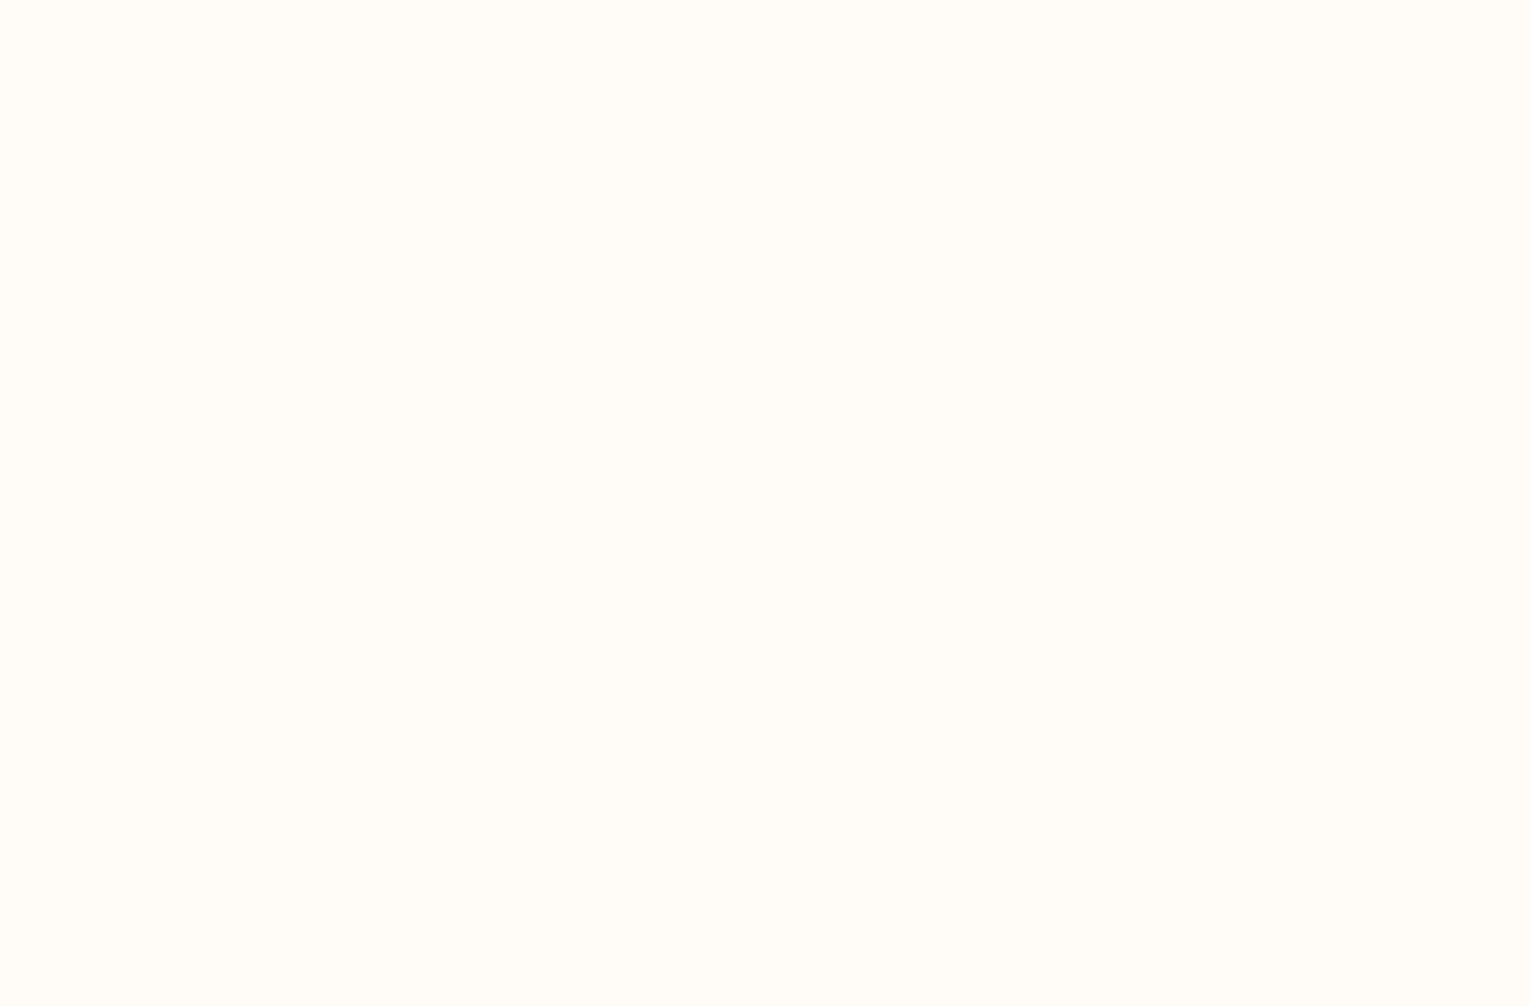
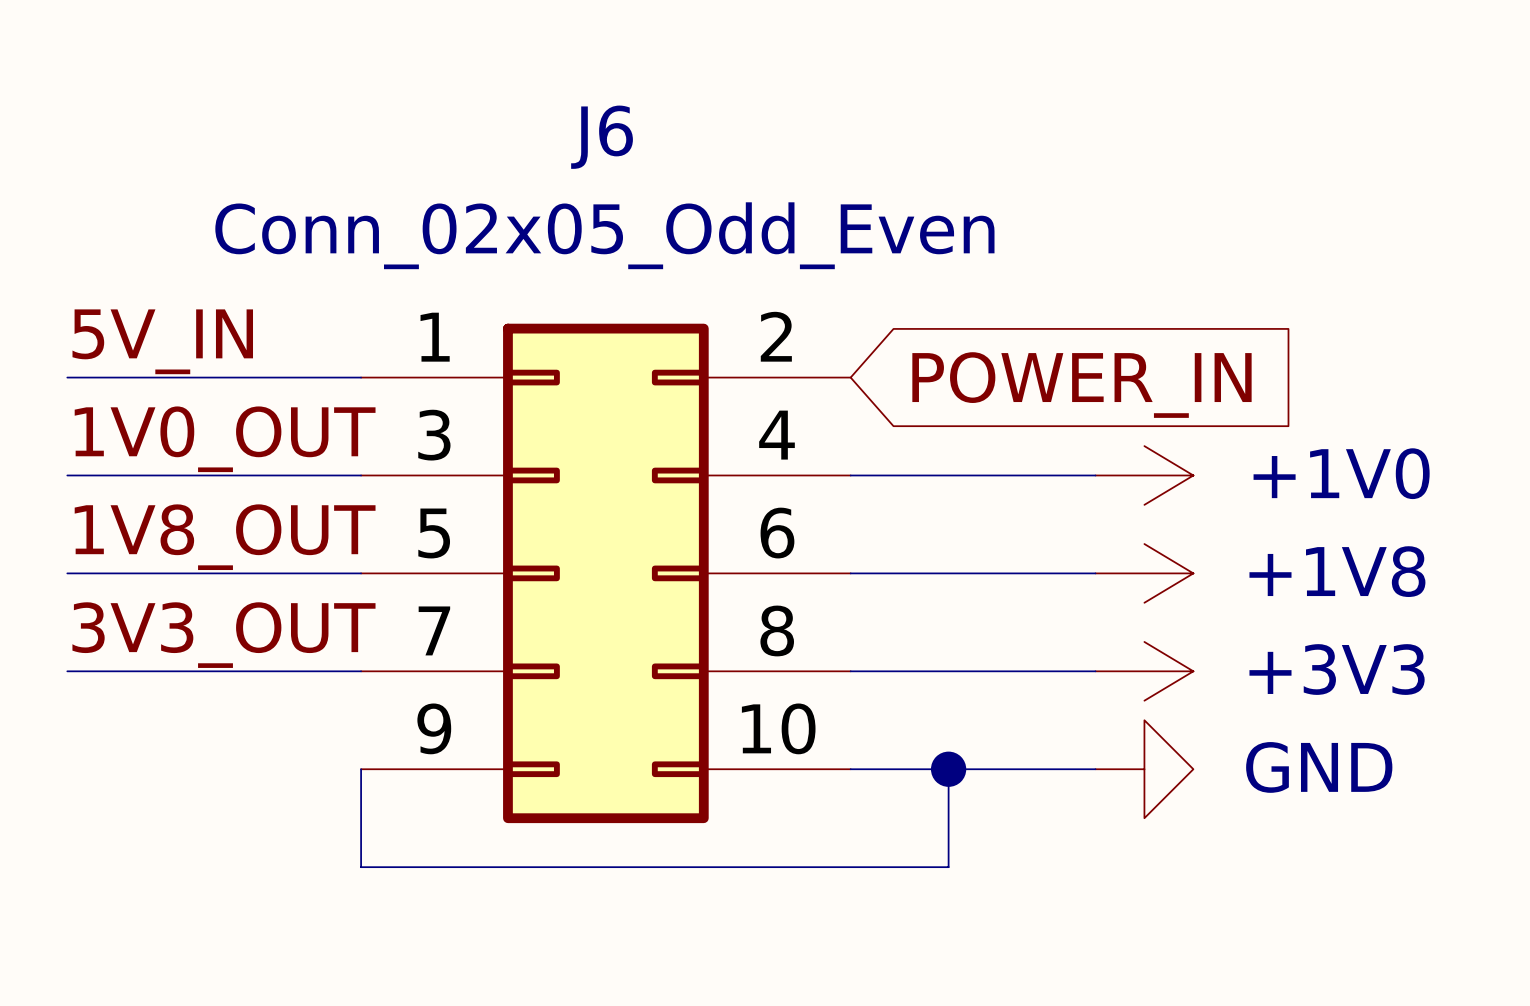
label: none -> 5V_IN (162, 341)
wire: none -> (67, 377) (361, 377)
global label: none -> POWER_IN (1081, 385)
label: none -> 1V0_OUT (225, 439)
wire: none -> (67, 475) (361, 475)
wire: none -> (850, 475) (1095, 475)
power symbol: none -> +1V0 (1144, 475)
label: none -> 1V8_OUT (225, 537)
wire: none -> (67, 573) (361, 573)
J6: none -> Conn_02x05_Odd_Even (605, 573)
wire: none -> (850, 573) (1095, 573)
power symbol: none -> +1V8 (1144, 573)
label: none -> 3V3_OUT (223, 635)
wire: none -> (67, 671) (361, 671)
wire: none -> (850, 671) (1095, 671)
power symbol: none -> +3V3 (1144, 671)
wire: none -> (361, 769) (361, 867) (948, 867) (948, 769)
wire: none -> (850, 769) (1095, 769)
junction: none -> (948, 769)
power symbol: none -> GND (1144, 769)

